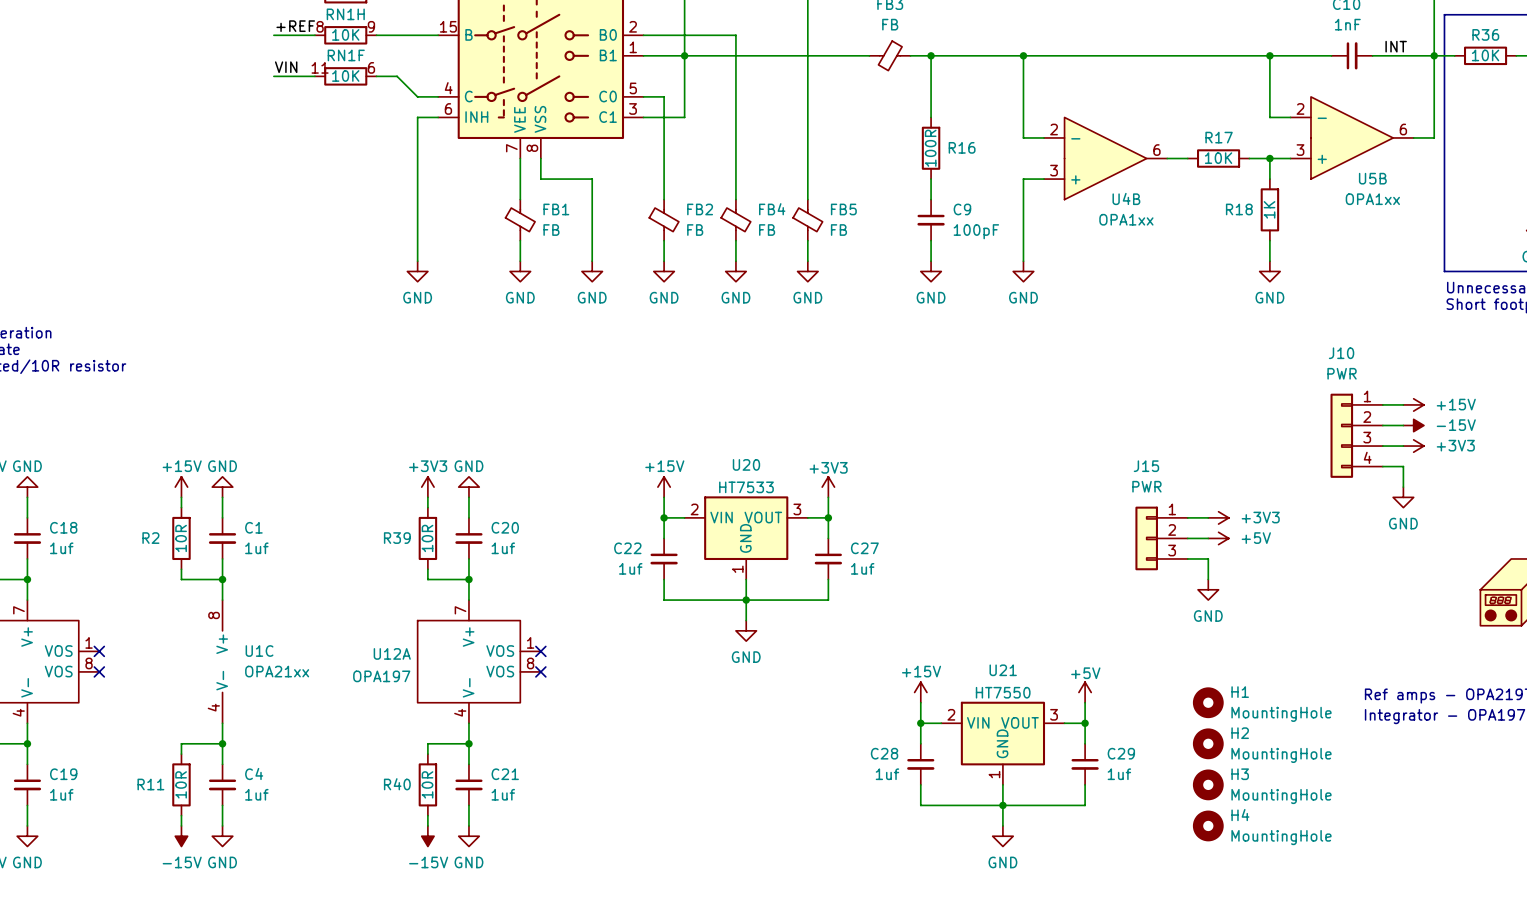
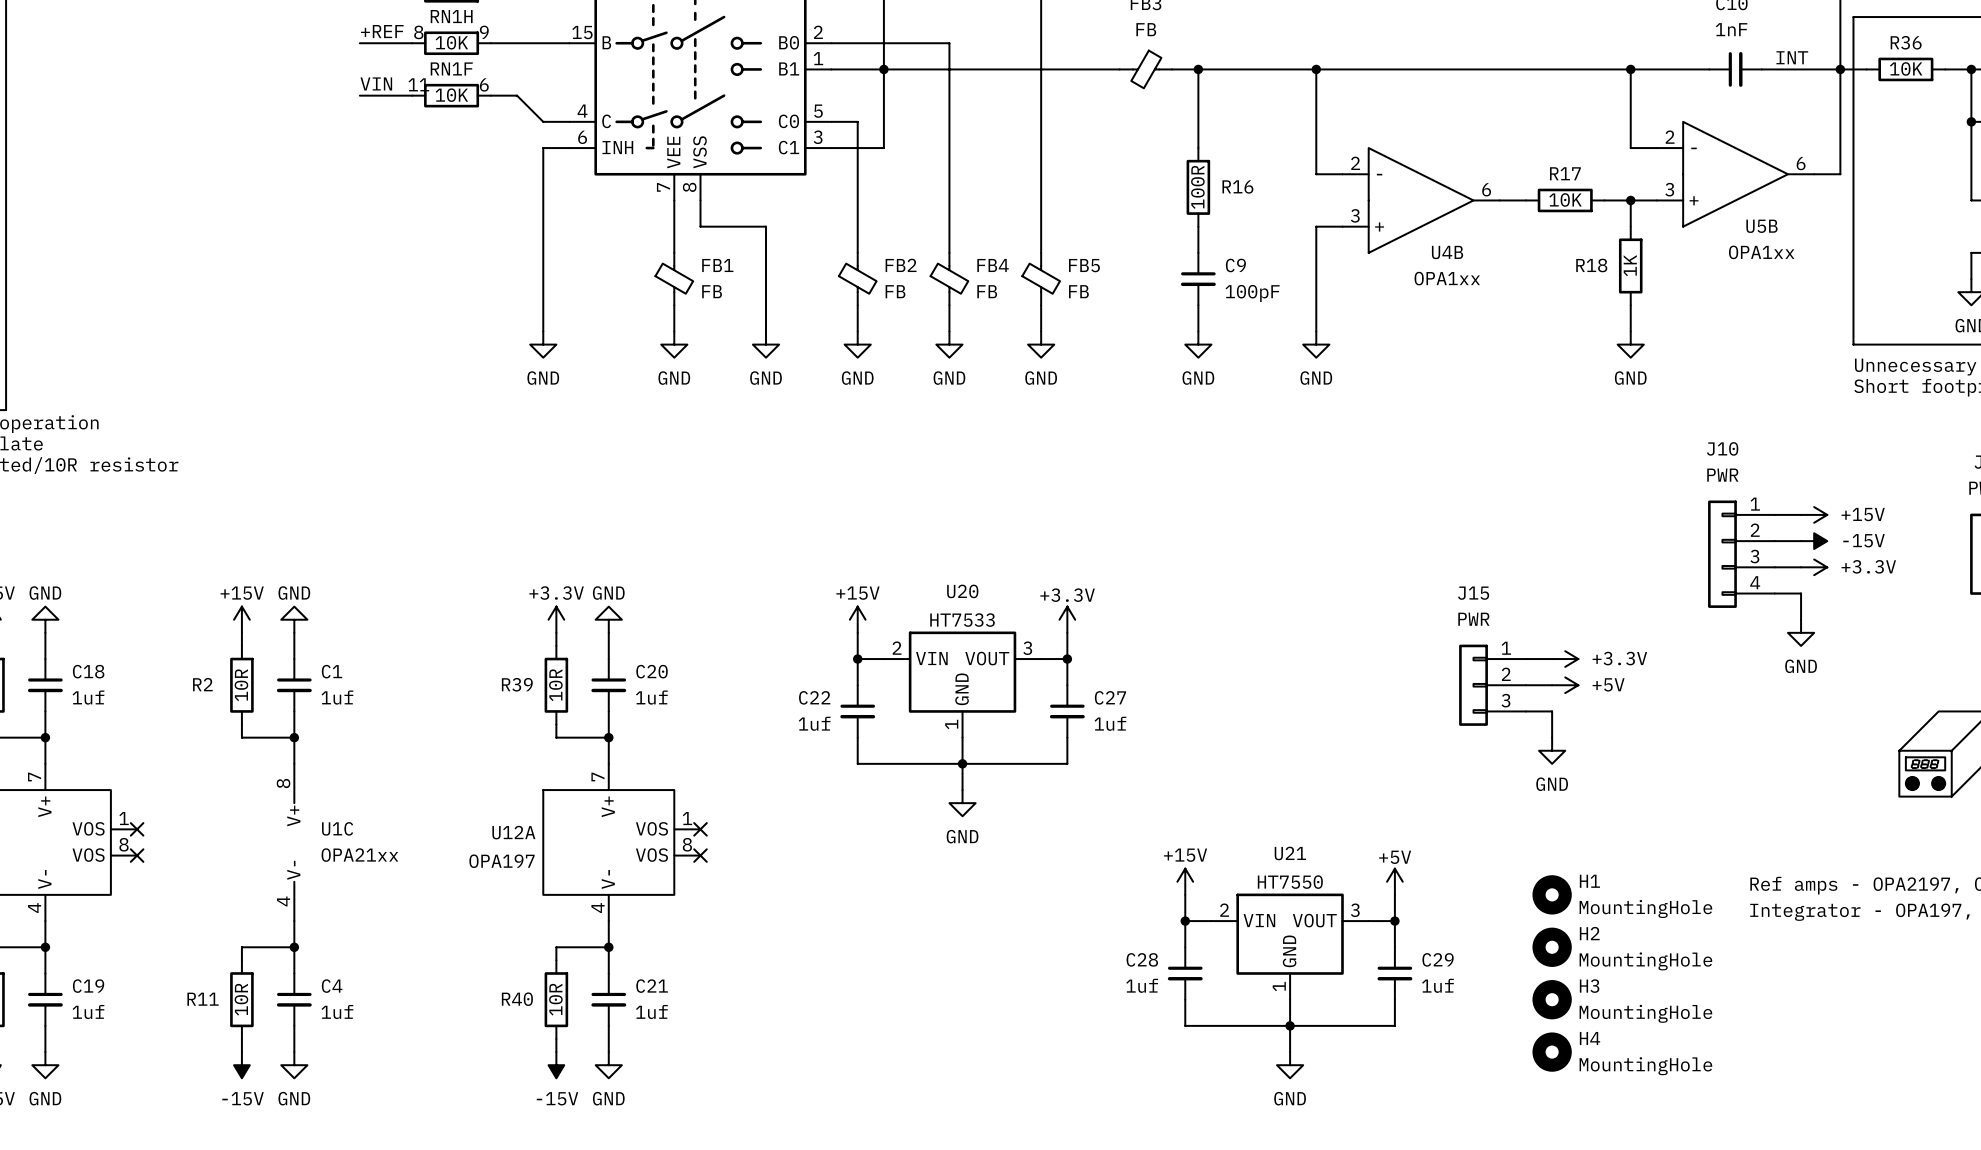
power symbol: +3V3 (1413, 446) -> +3.3V (1814, 567)
power symbol: +3V3 (427, 487) -> +3.3V (556, 619)
power symbol: +3V3 (828, 487) -> +3.3V (1067, 619)
power symbol: +3V3 (1218, 517) -> +3.3V (1565, 659)

